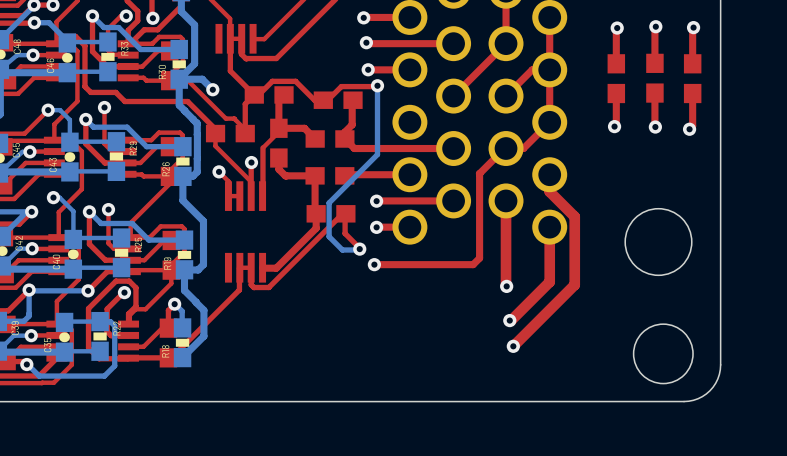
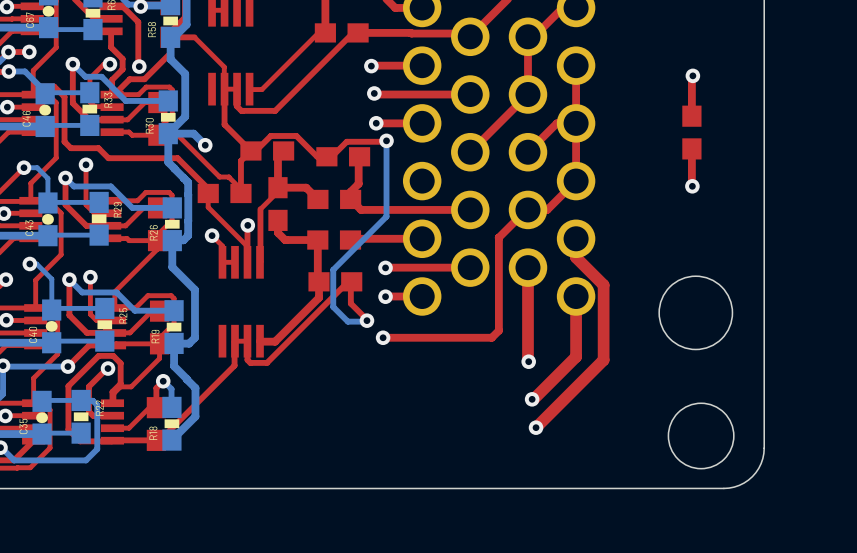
top track: (693, 27) (692, 63) -> none
via: (693, 27) -> none
top track: (617, 28) (616, 63) -> none
via: (617, 28) -> none
part: (616, 78) -> none
part: (692, 78) -> none
top track: (616, 93) (616, 124) (614, 126) -> none
top track: (692, 93) (692, 126) (689, 129) -> none
via: (614, 126) -> none
via: (689, 129) -> none

